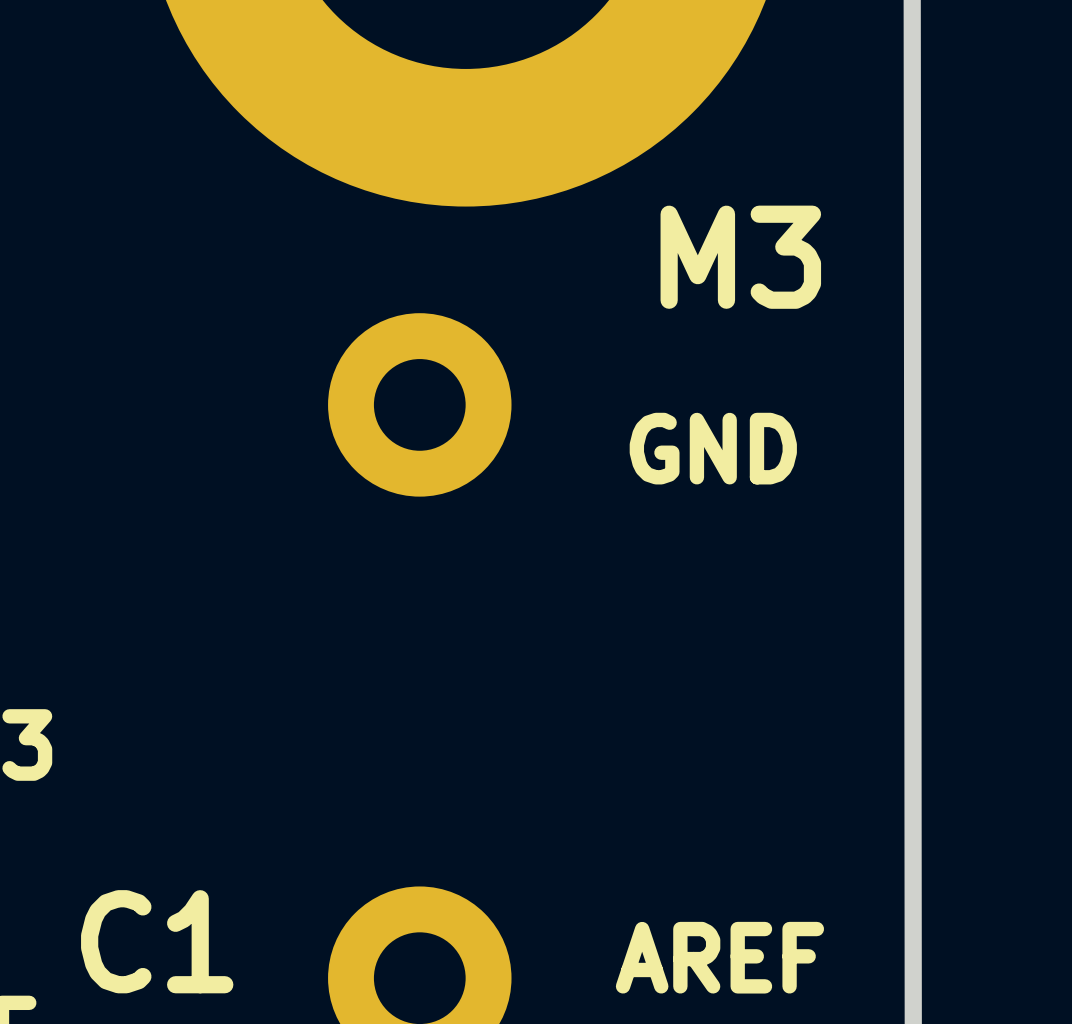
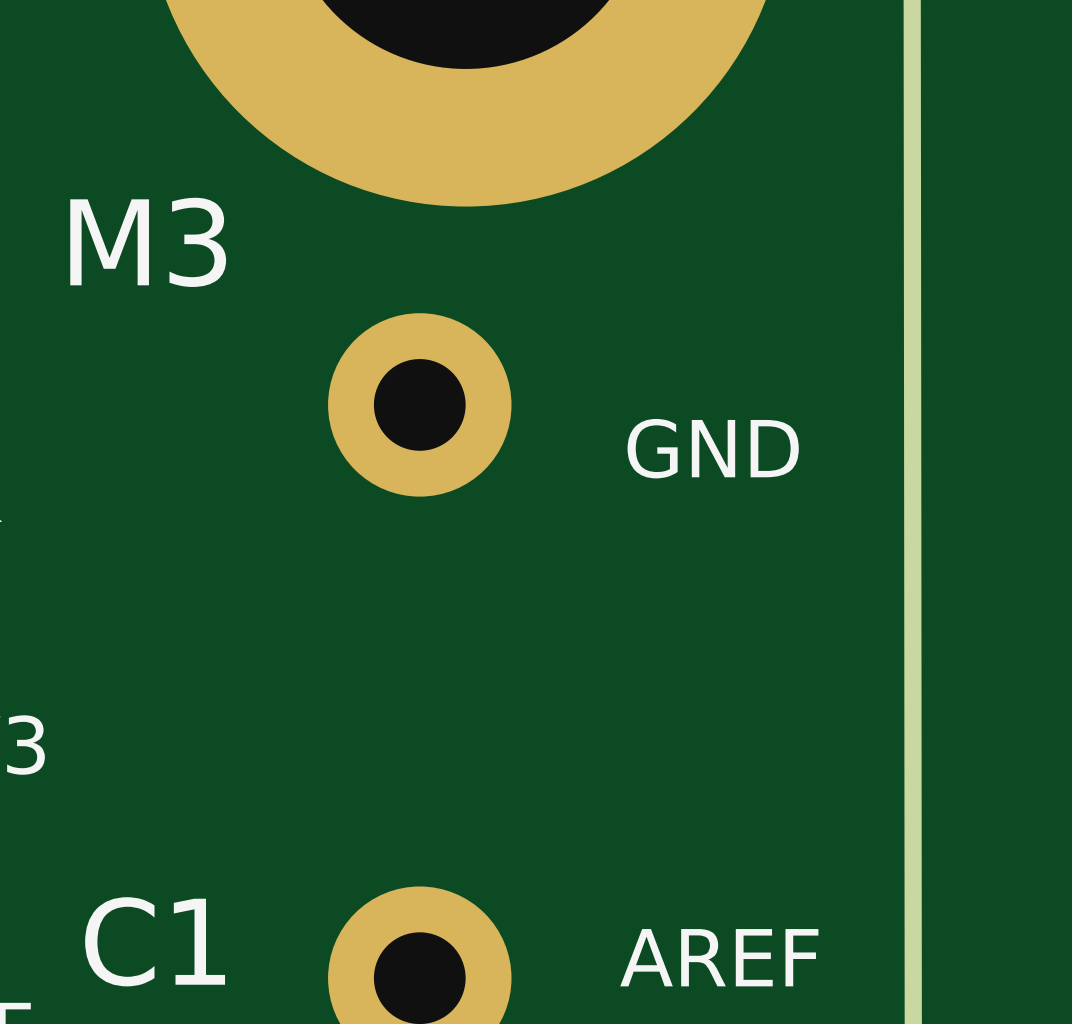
text position: M3 (740, 257) -> M3 (148, 242)

